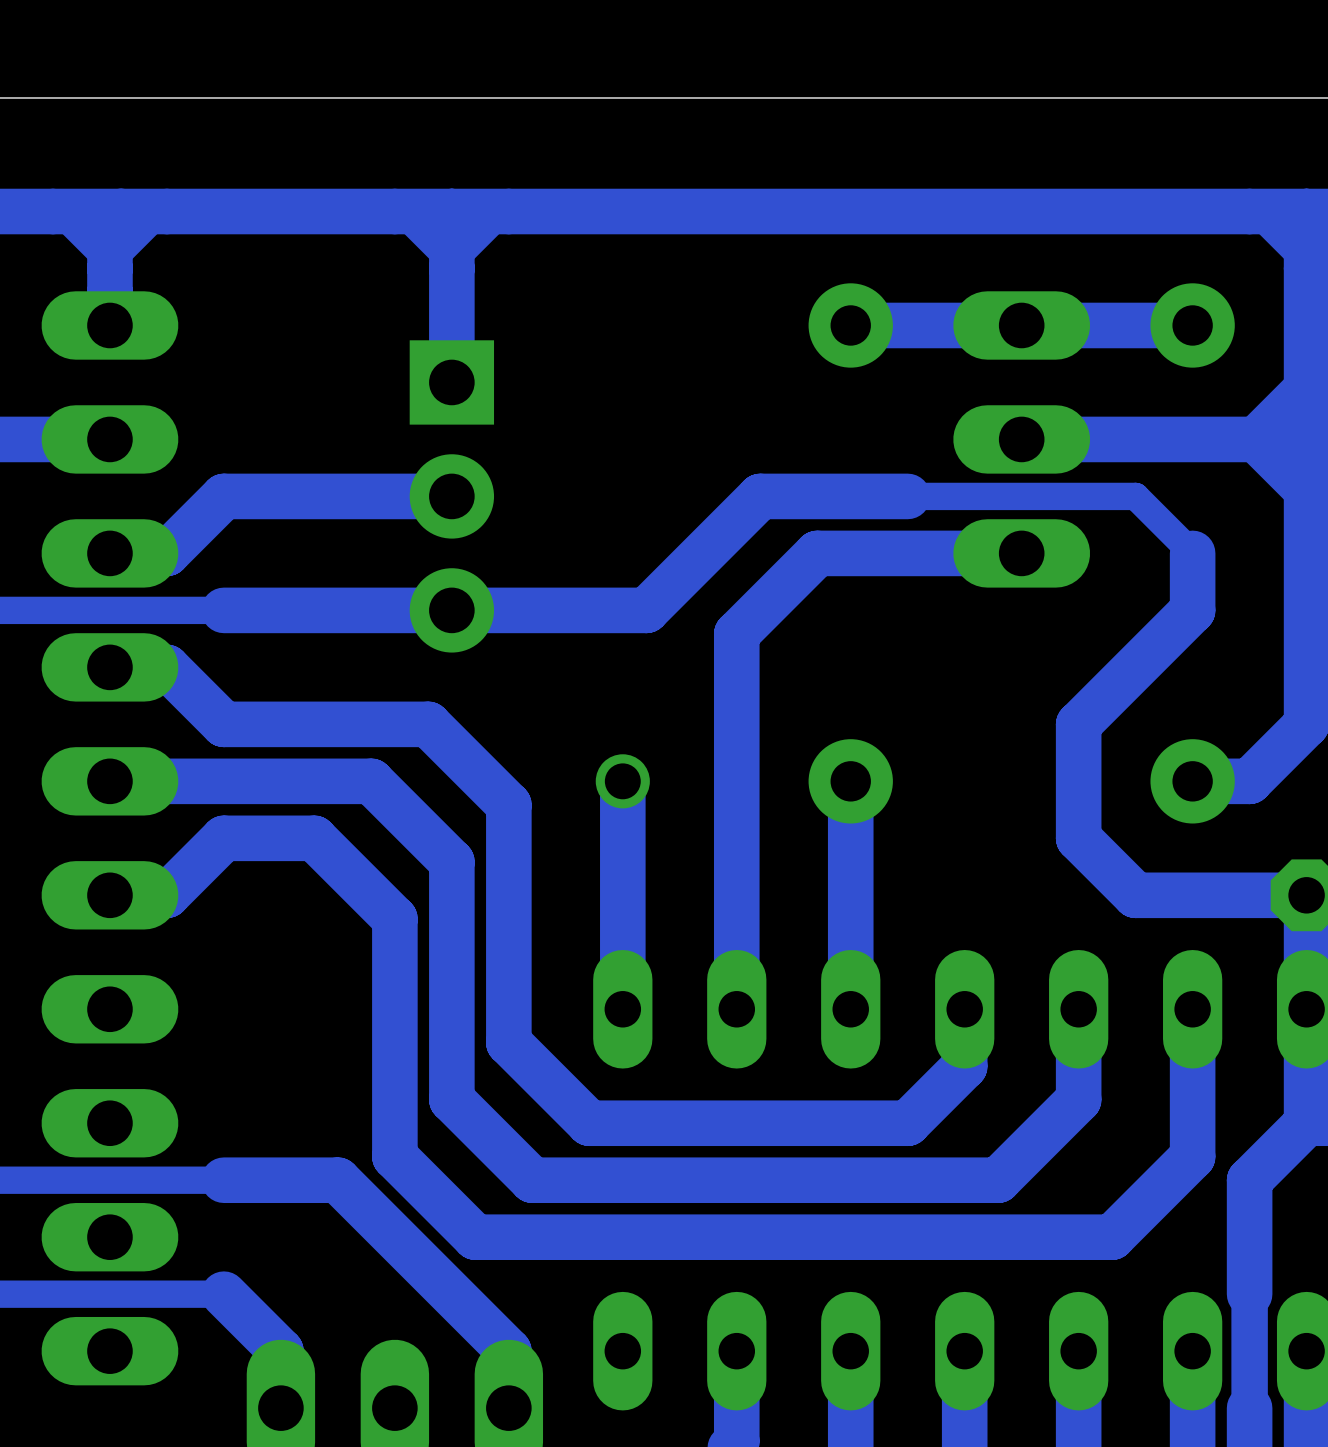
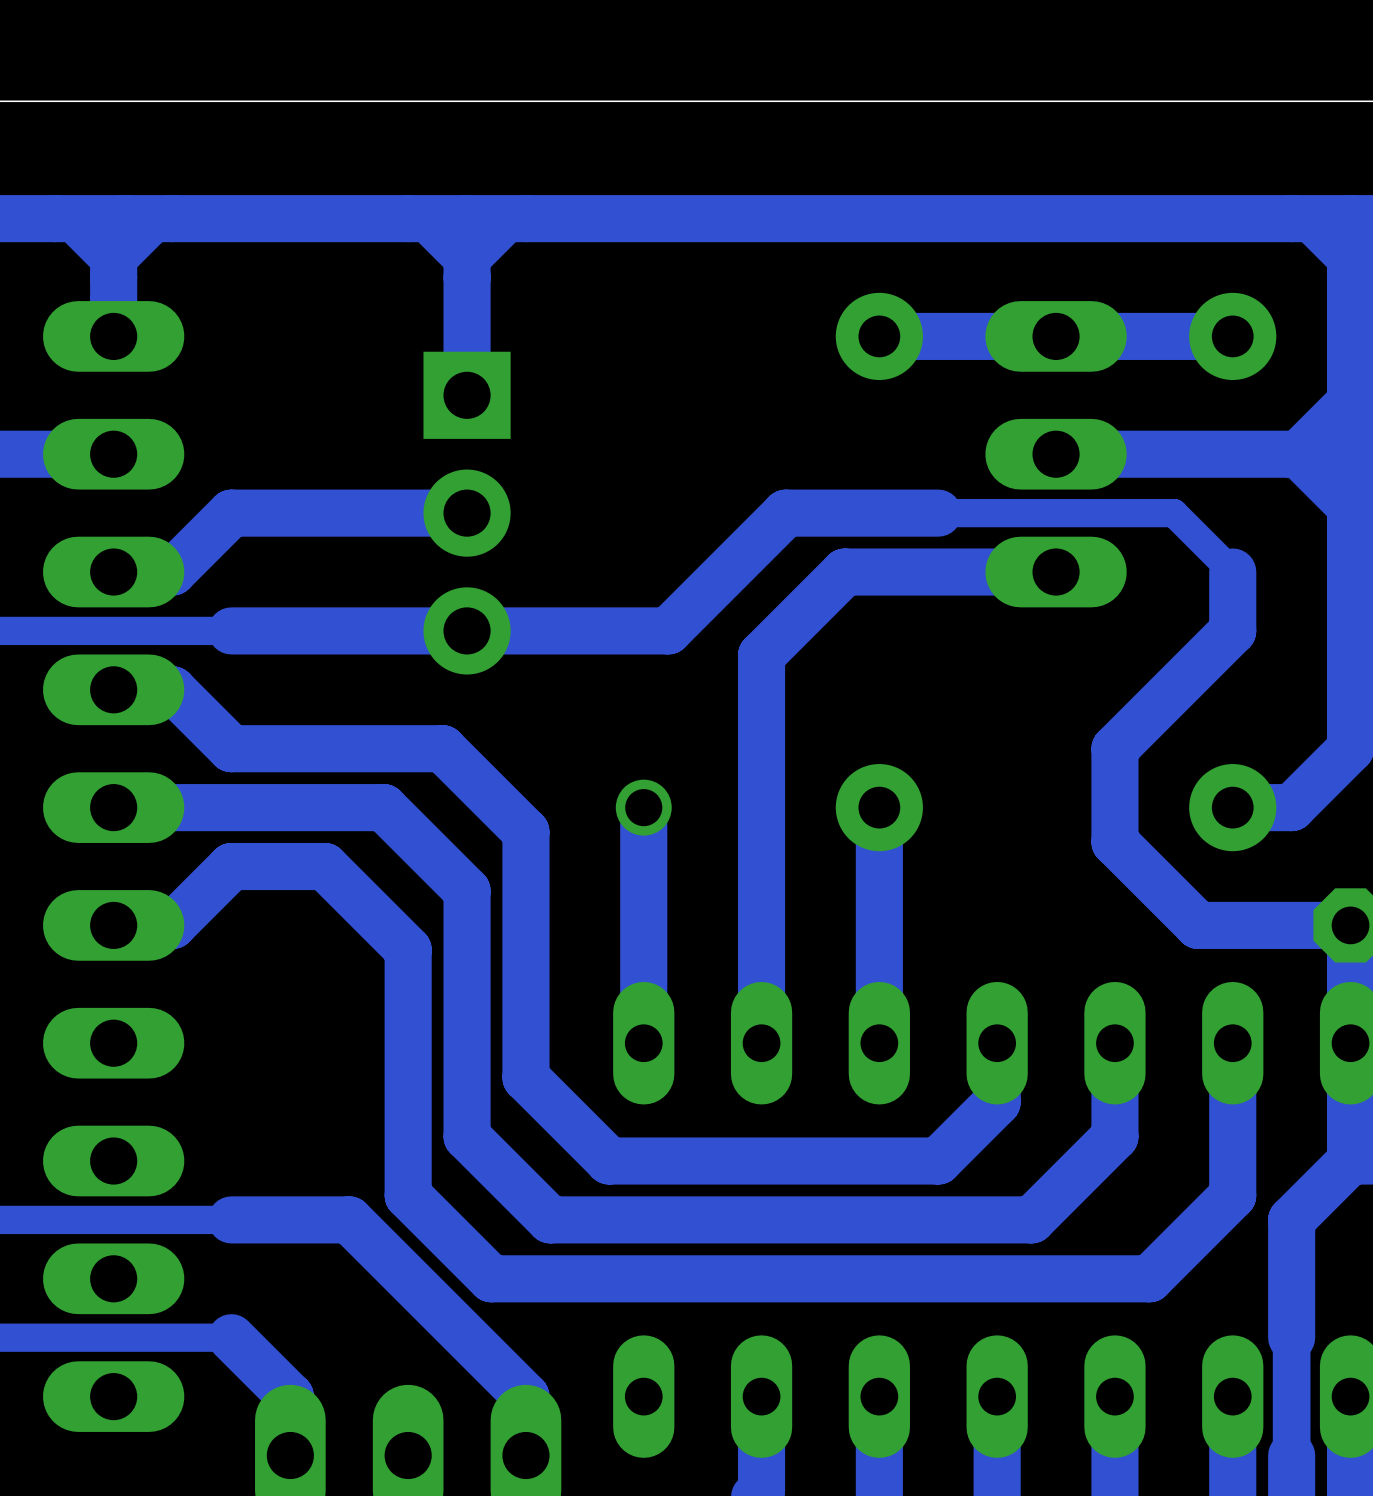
bottom track: (1078, 814) (1078, 838) (1135, 895) (1159, 895) -> (1114, 842) (1198, 925)

